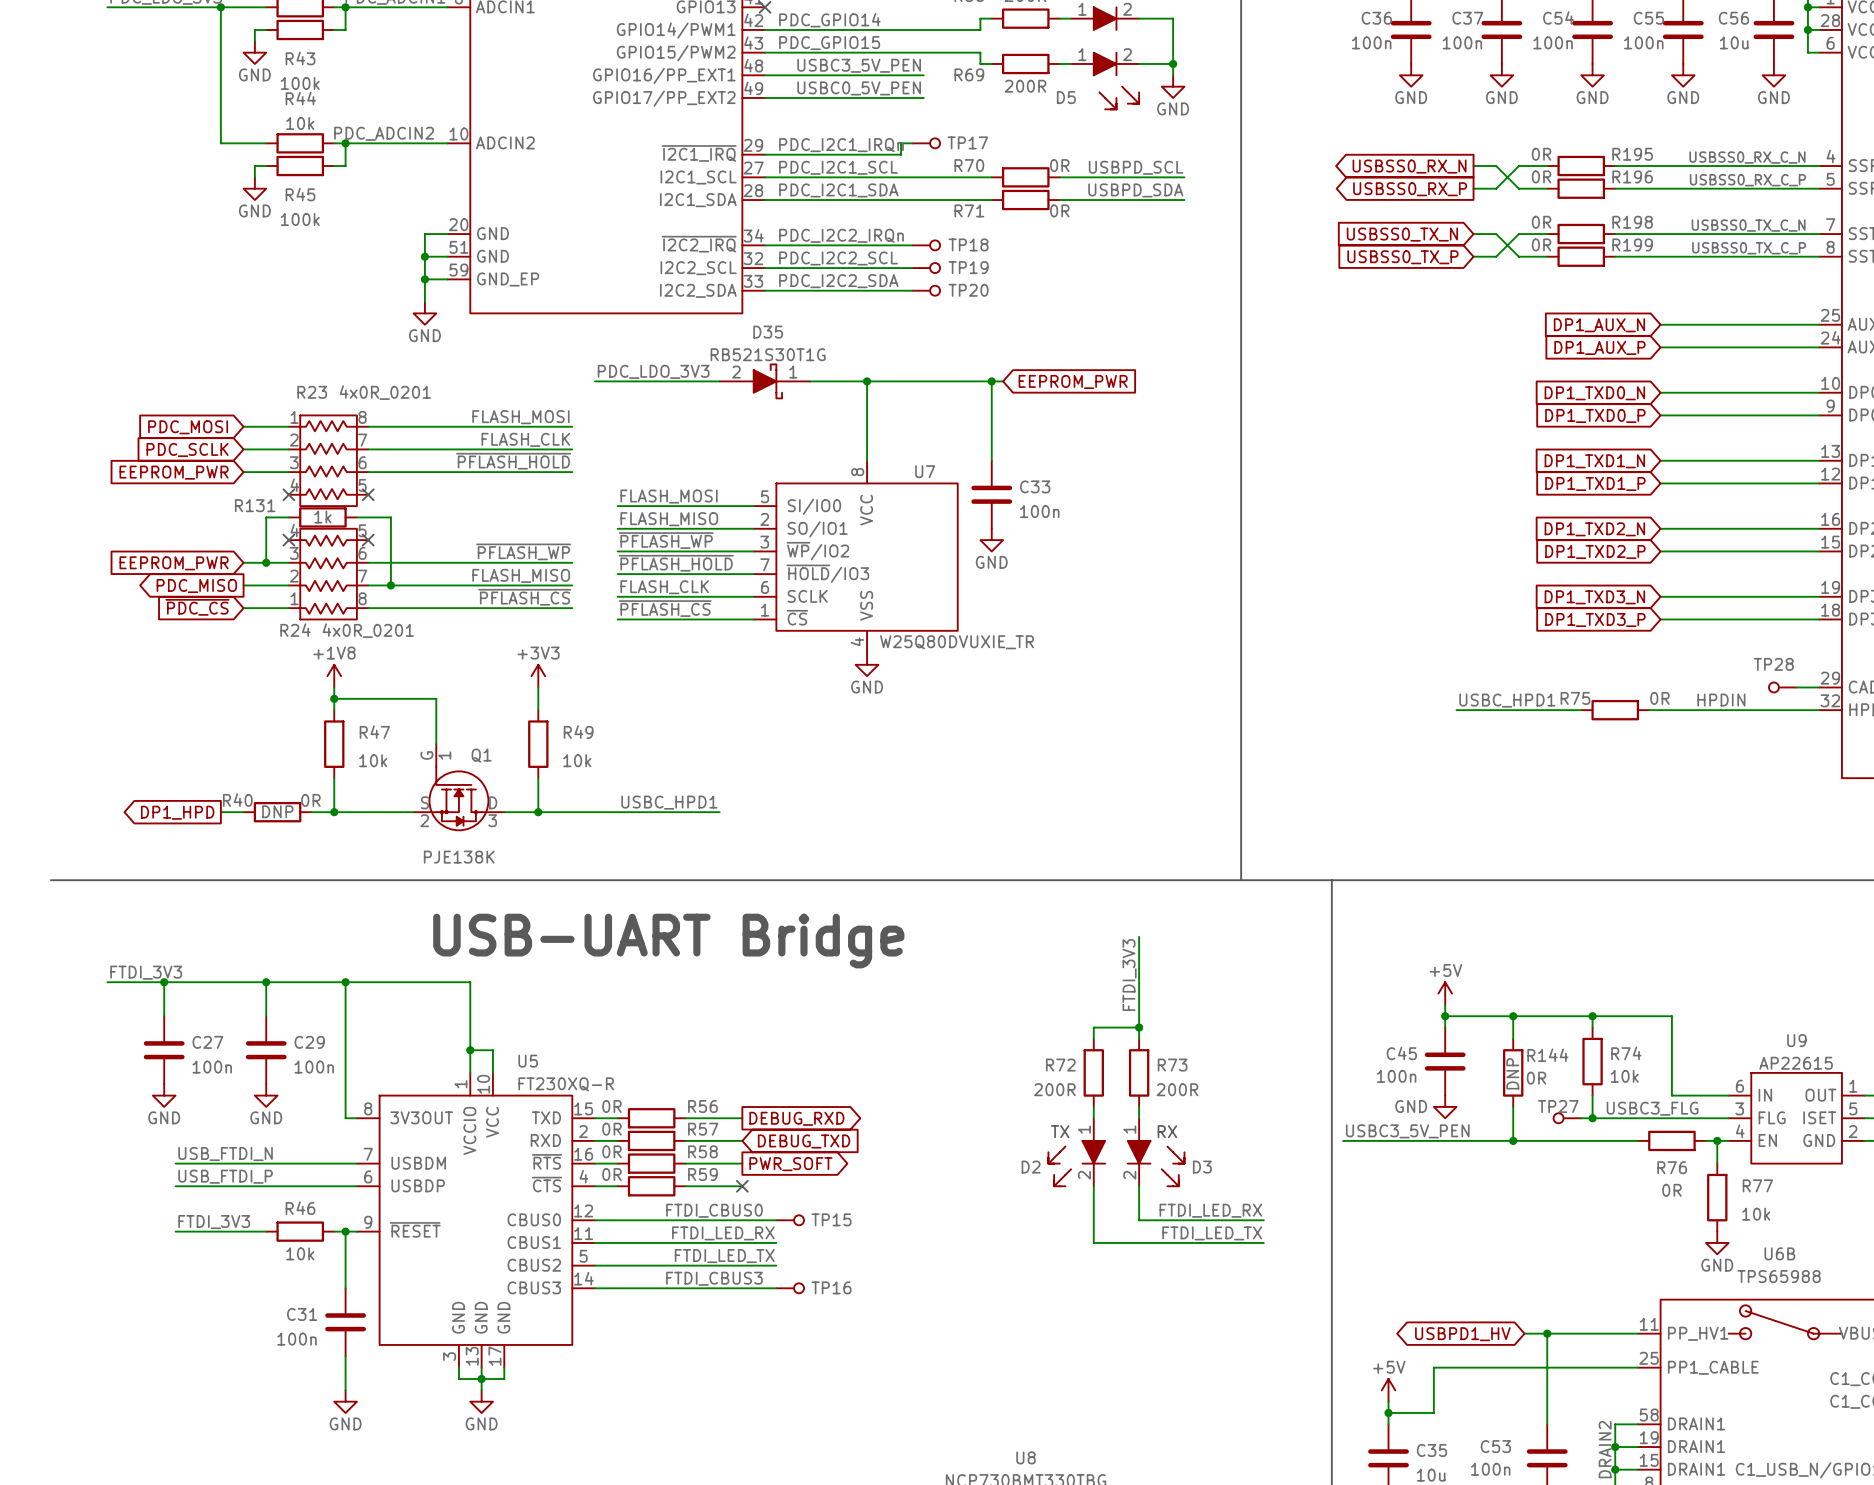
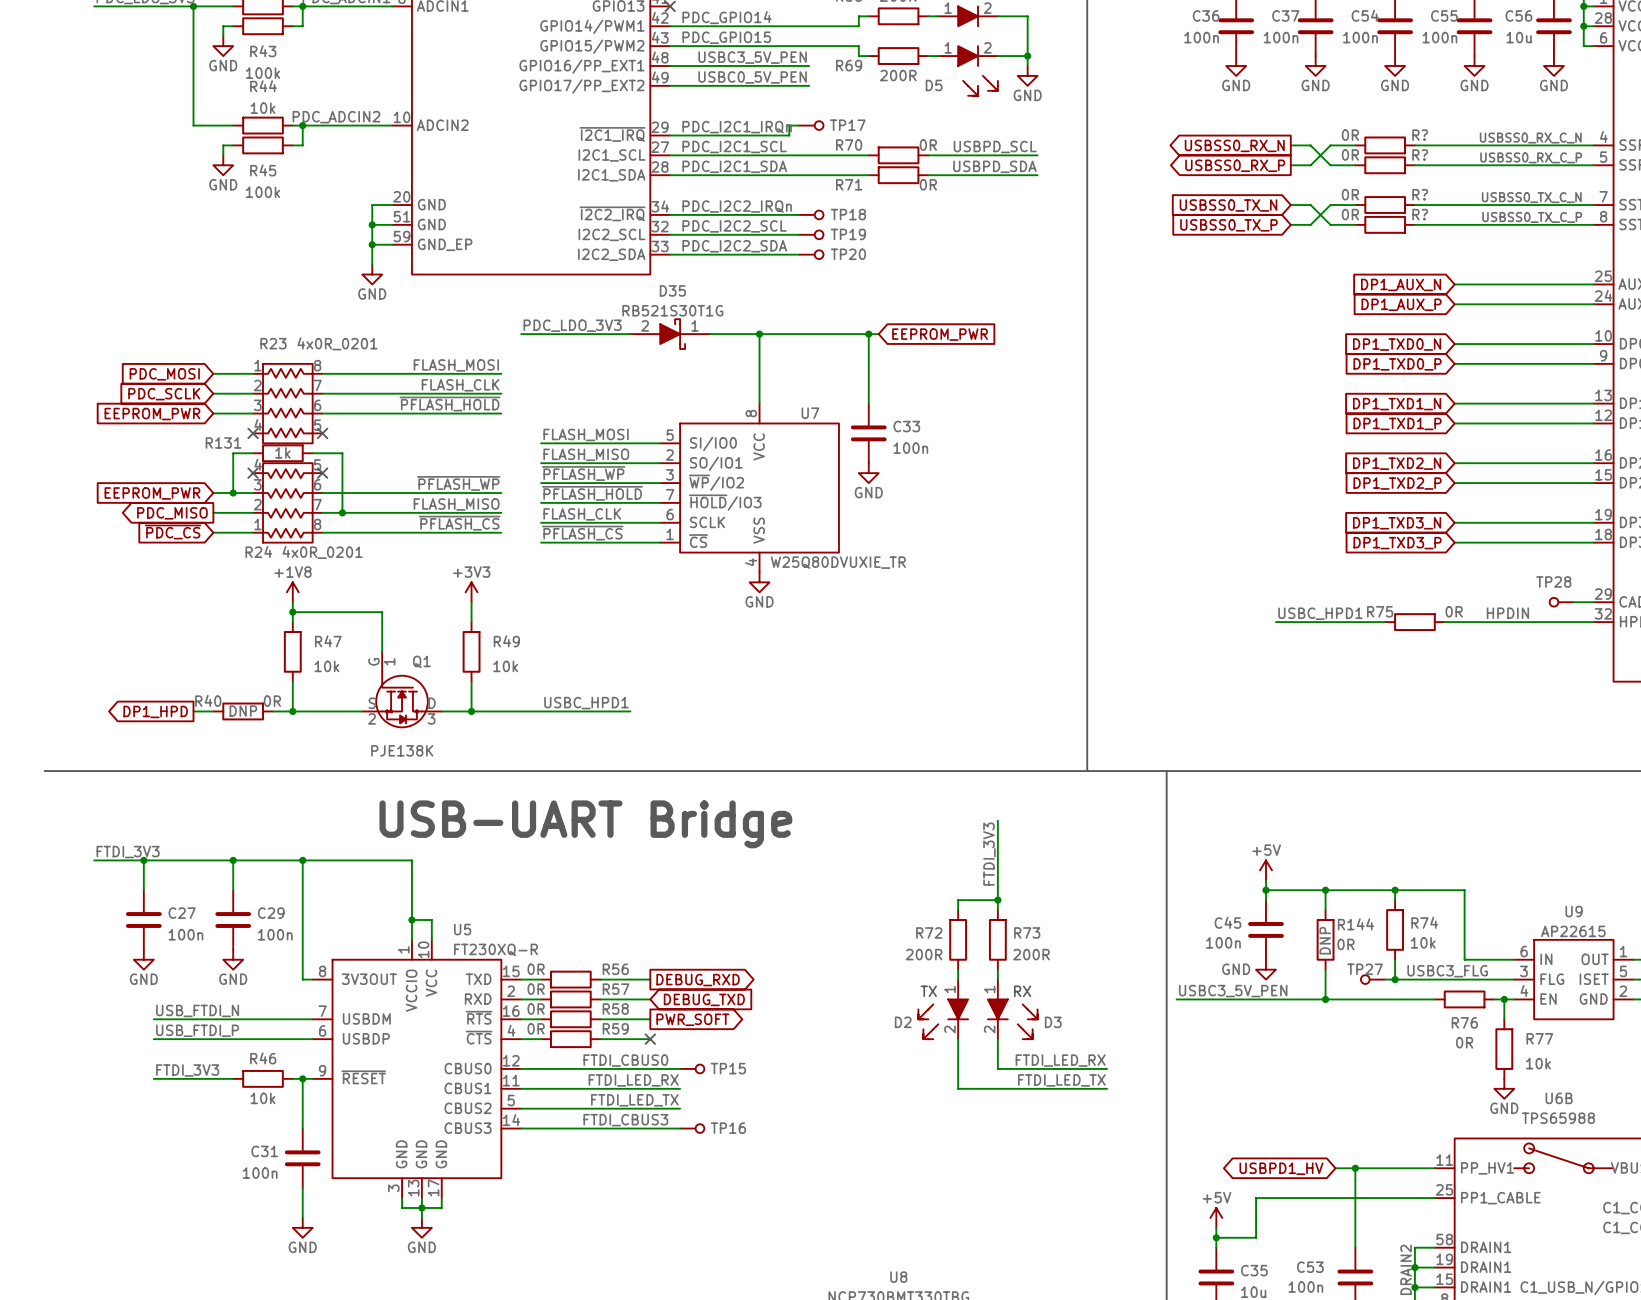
R195 name: R195 (1632, 154) -> R? (1420, 135)
R196 name: R196 (1632, 176) -> R? (1420, 154)
R198 name: R198 (1632, 222) -> R? (1420, 194)
R199 name: R199 (1632, 244) -> R? (1420, 214)

